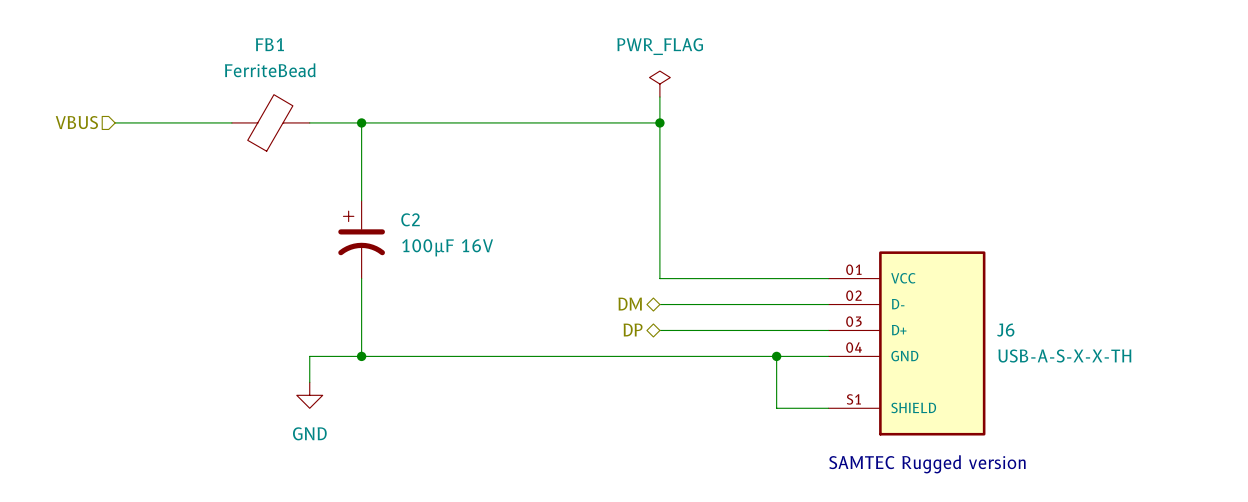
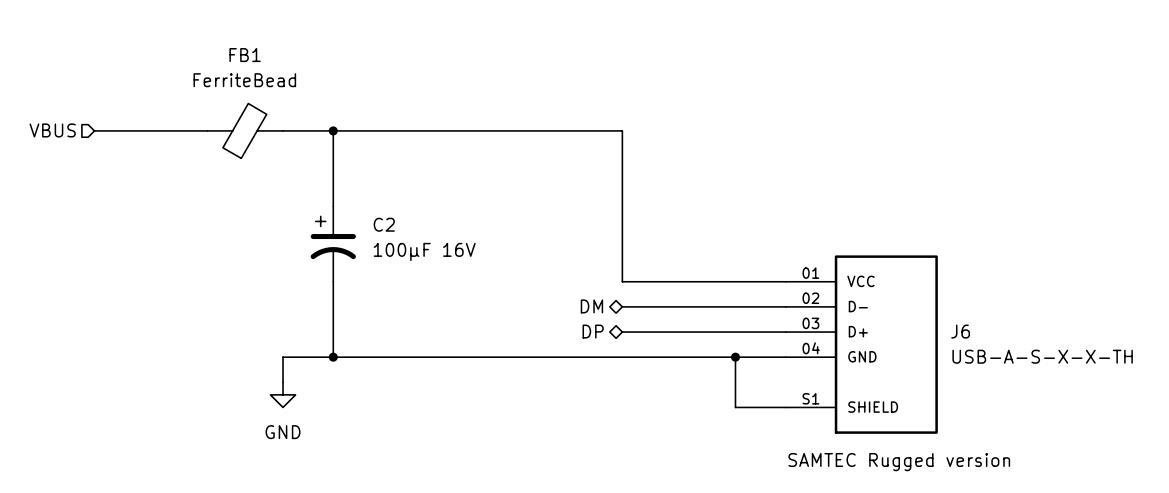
power symbol: PWR_FLAG (659, 84) -> none
wire: (659, 97) (659, 122) -> none
junction: (659, 122) -> none

